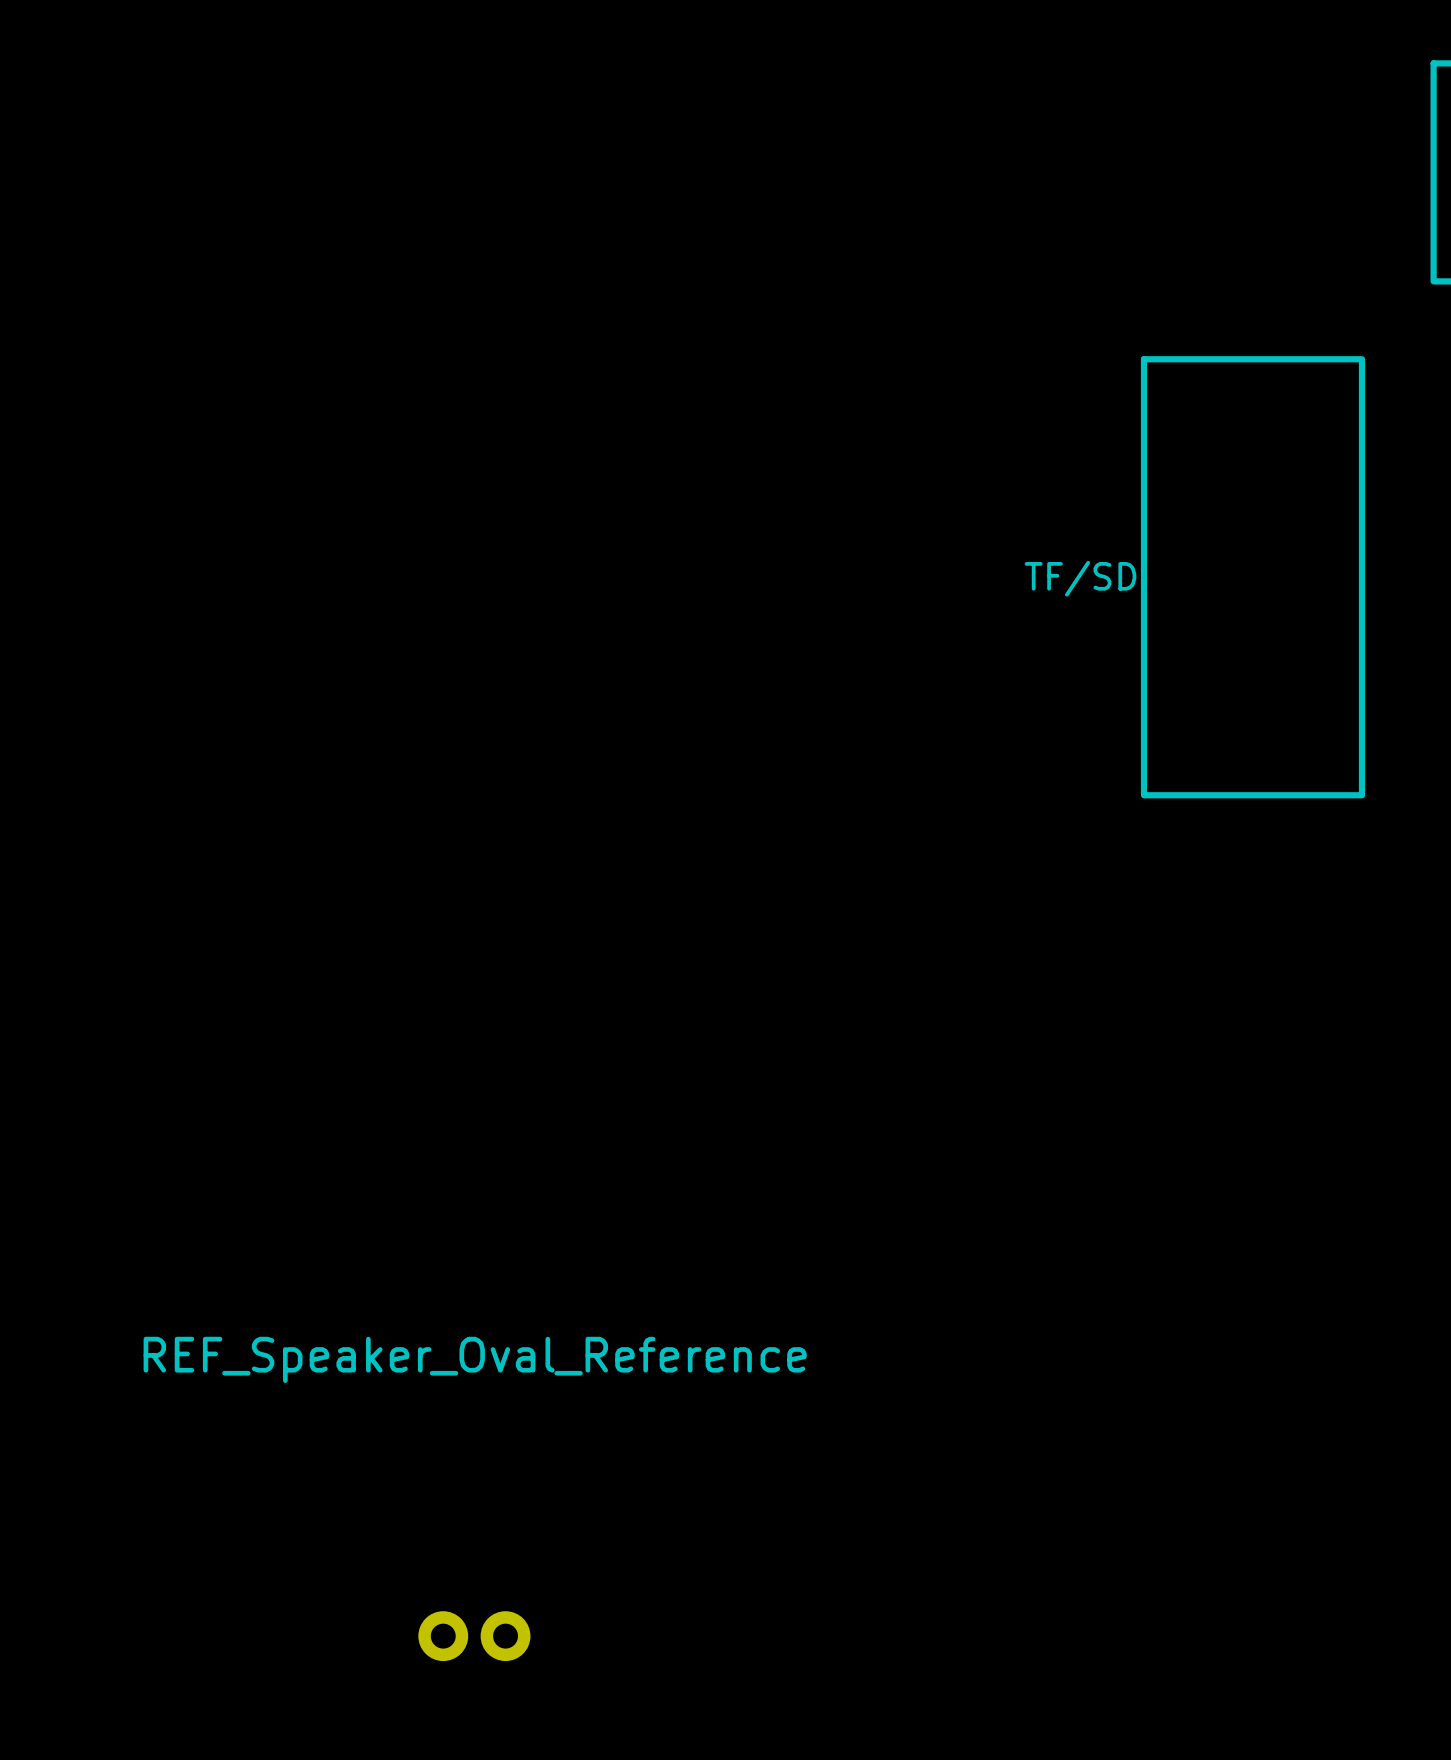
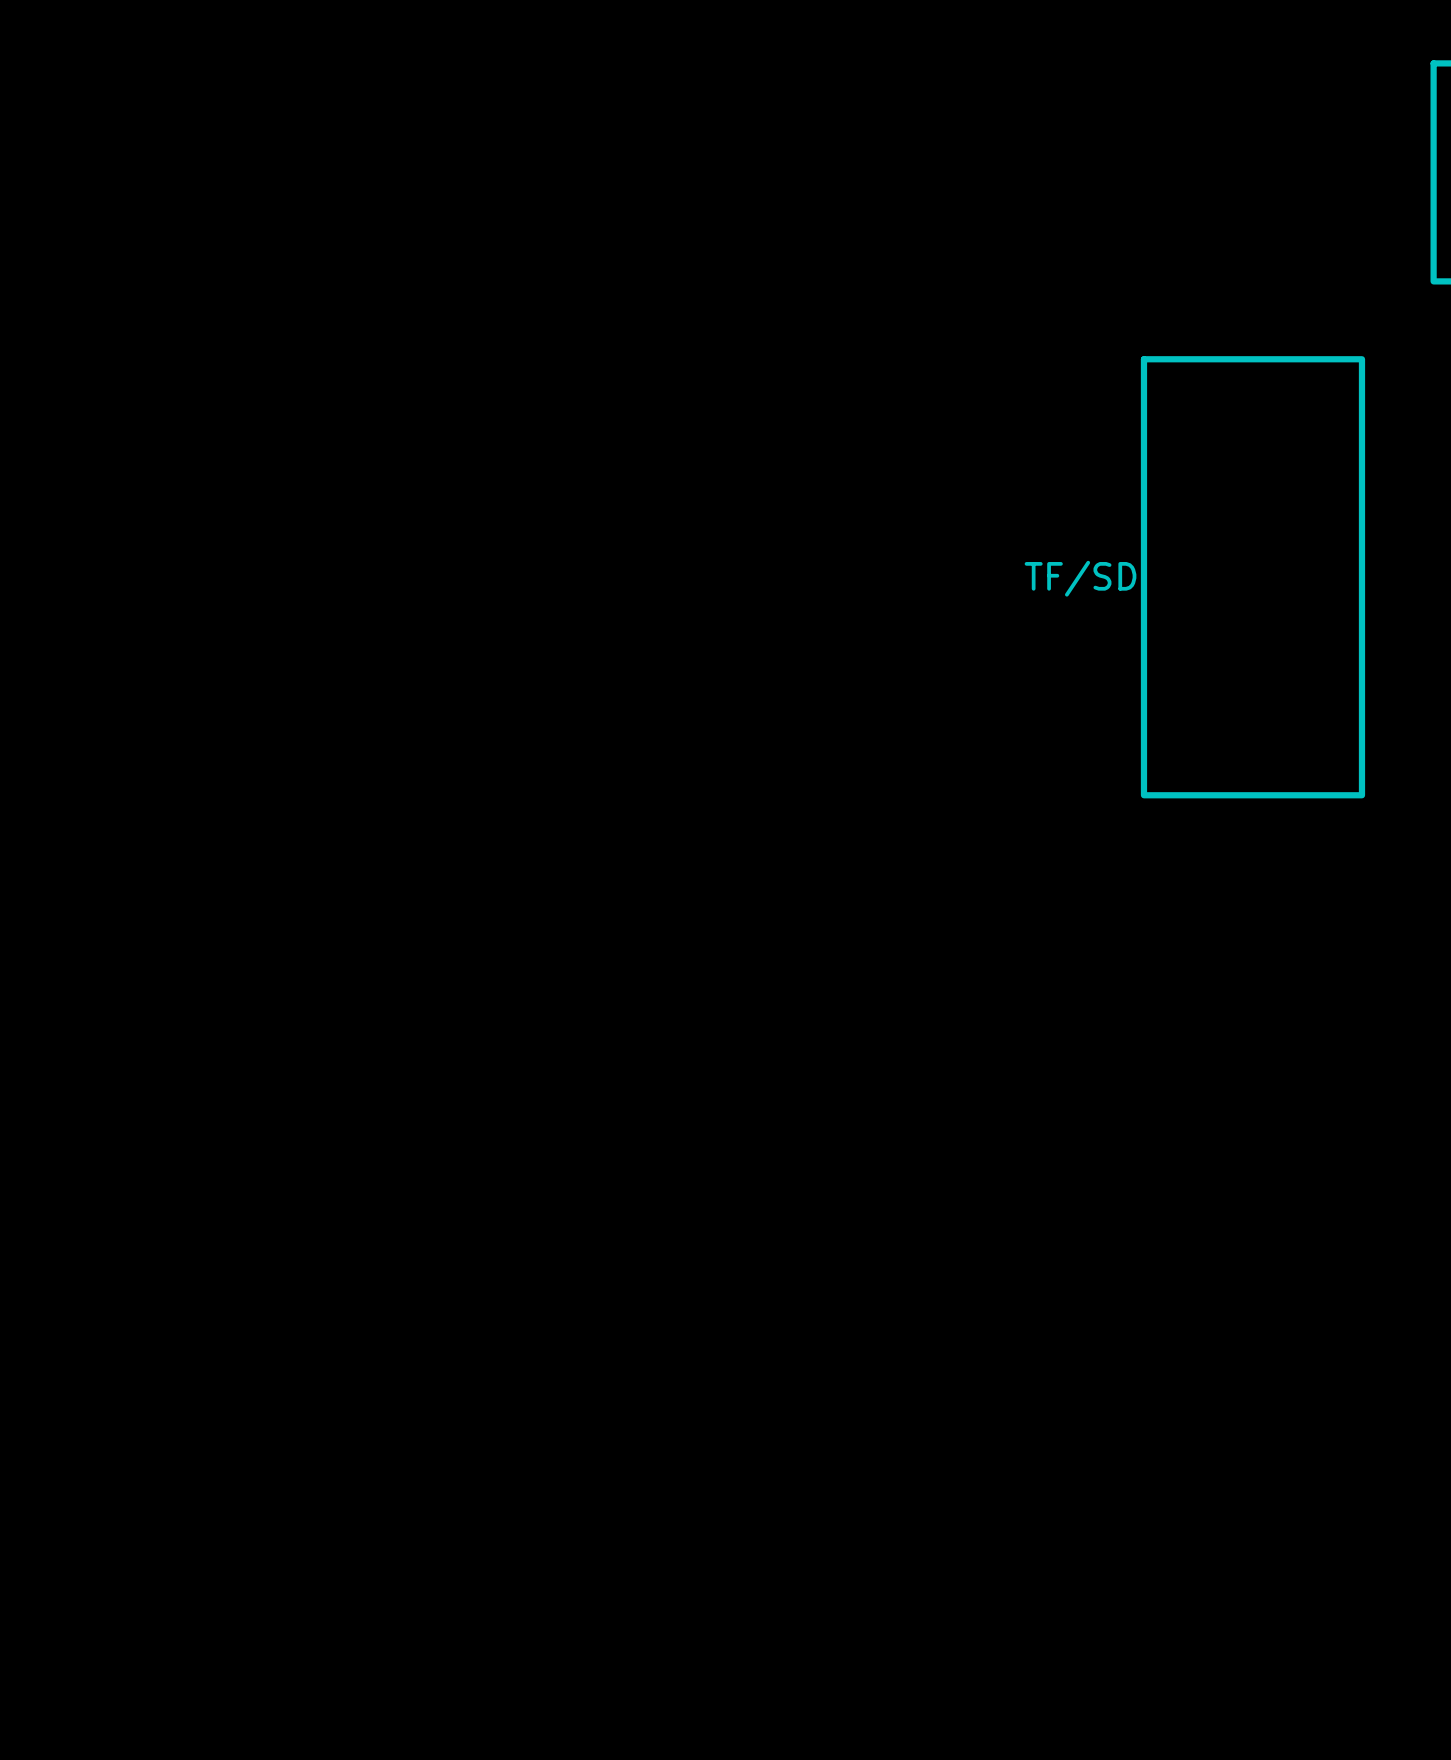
REF_Speaker_Oval_Reference: (474, 1636) -> none

